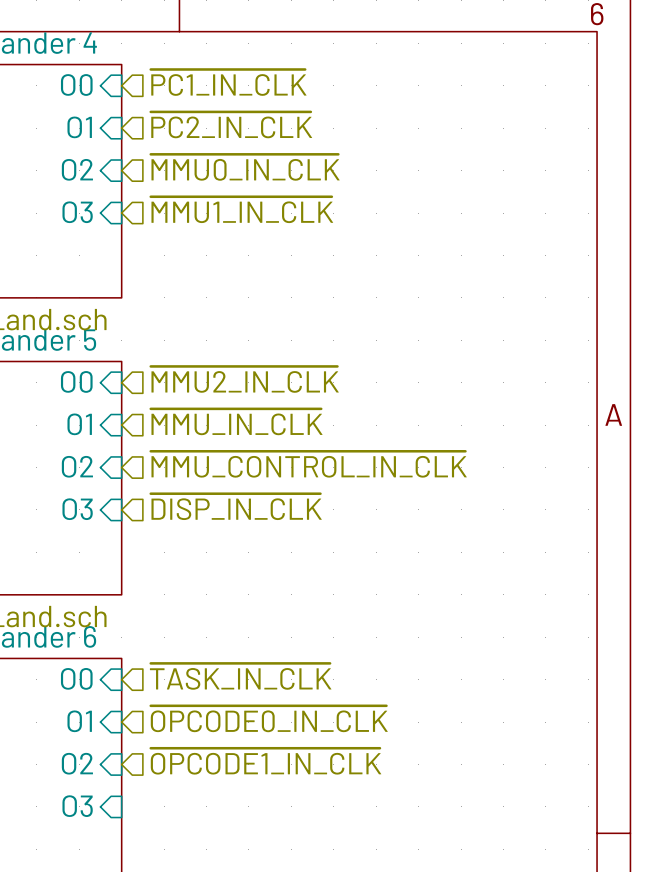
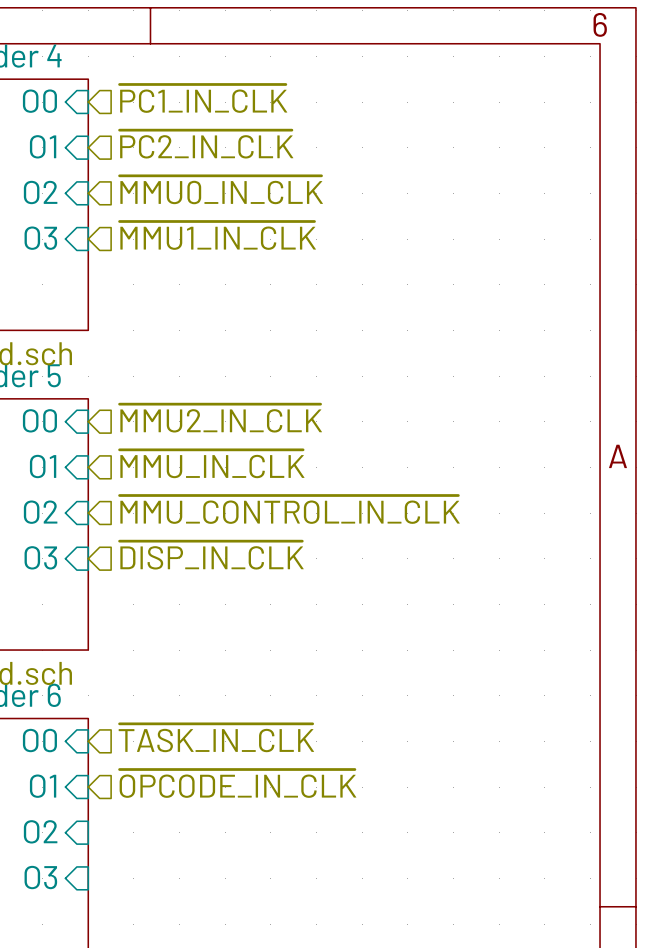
hierarchical label: ~{OPCODE0_IN_CLK} (269, 719) -> ~{OPCODE_IN_CLK} (237, 783)
hierarchical label: ~{OPCODE1_IN_CLK} (266, 761) -> none

